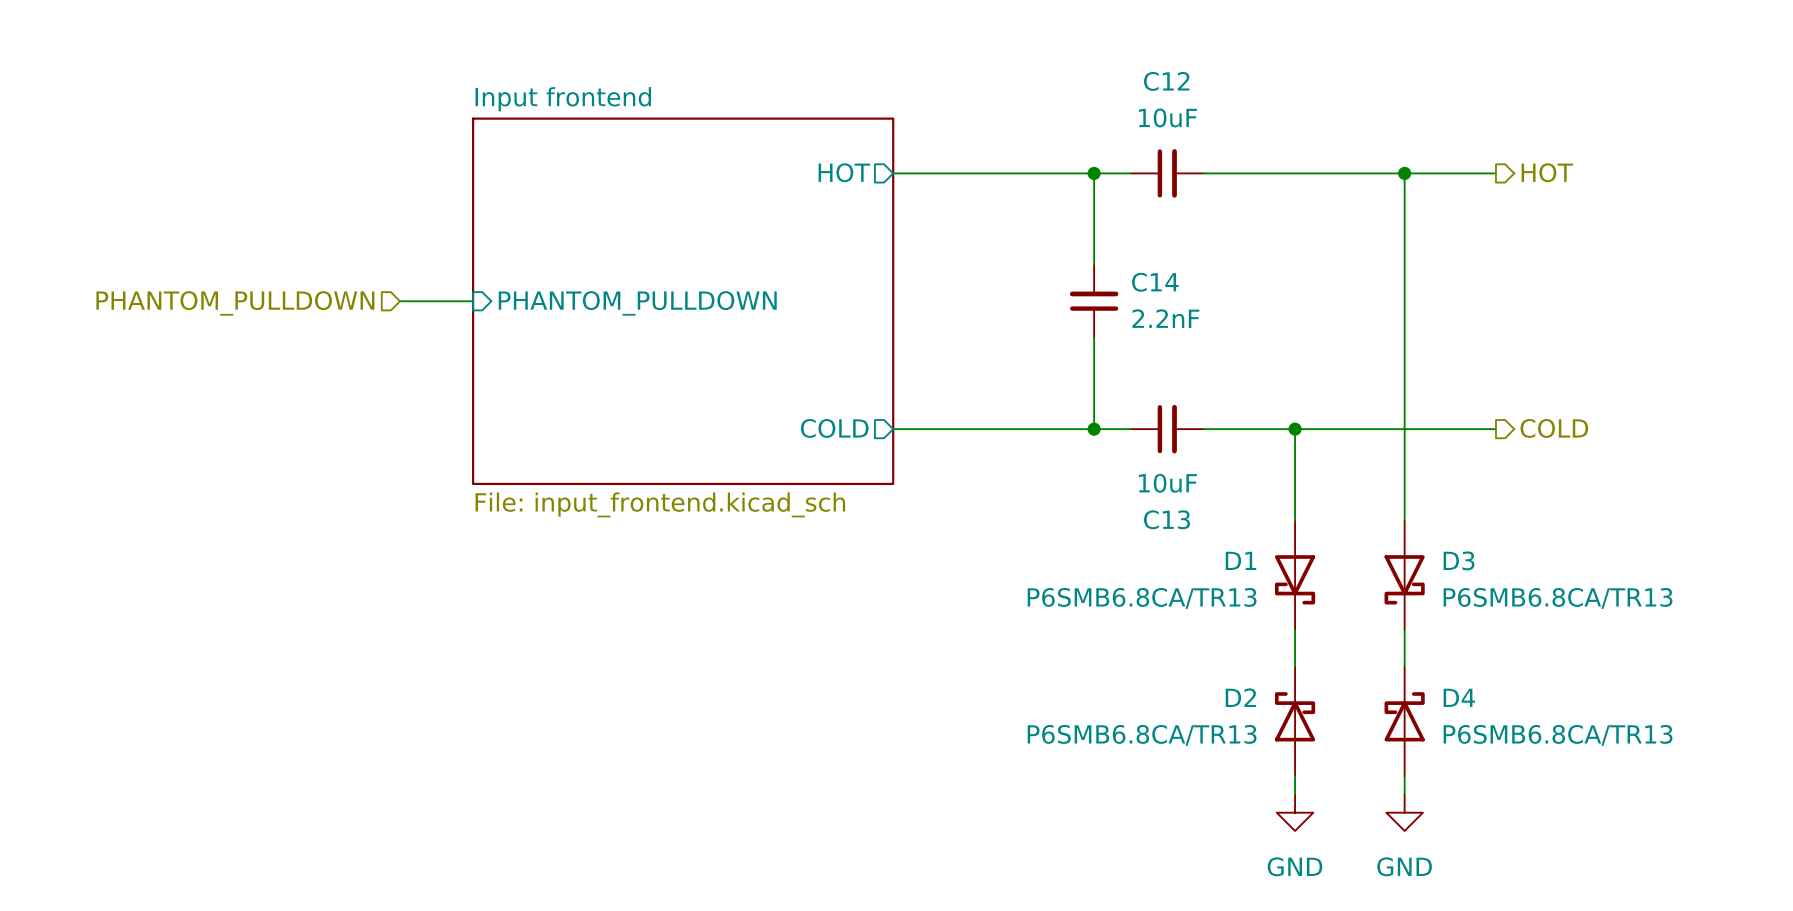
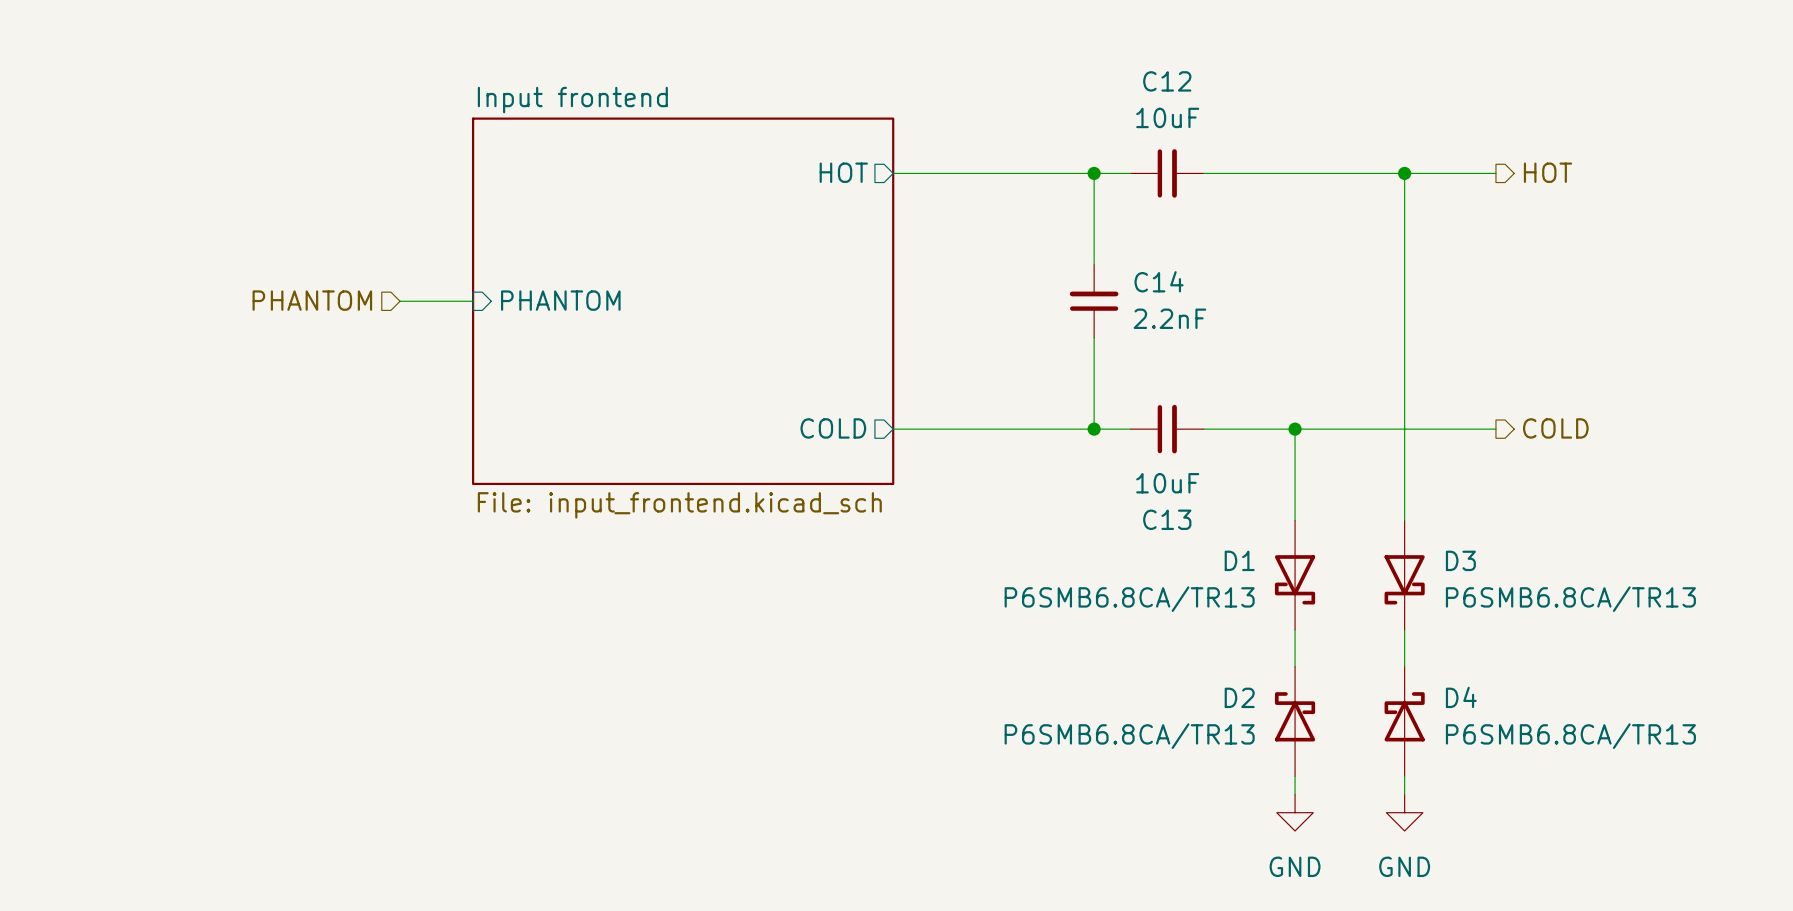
hierarchical label: PHANTOM_PULLDOWN (235, 303) -> PHANTOM (312, 300)
sheet pin: PHANTOM_PULLDOWN (637, 303) -> PHANTOM (560, 300)

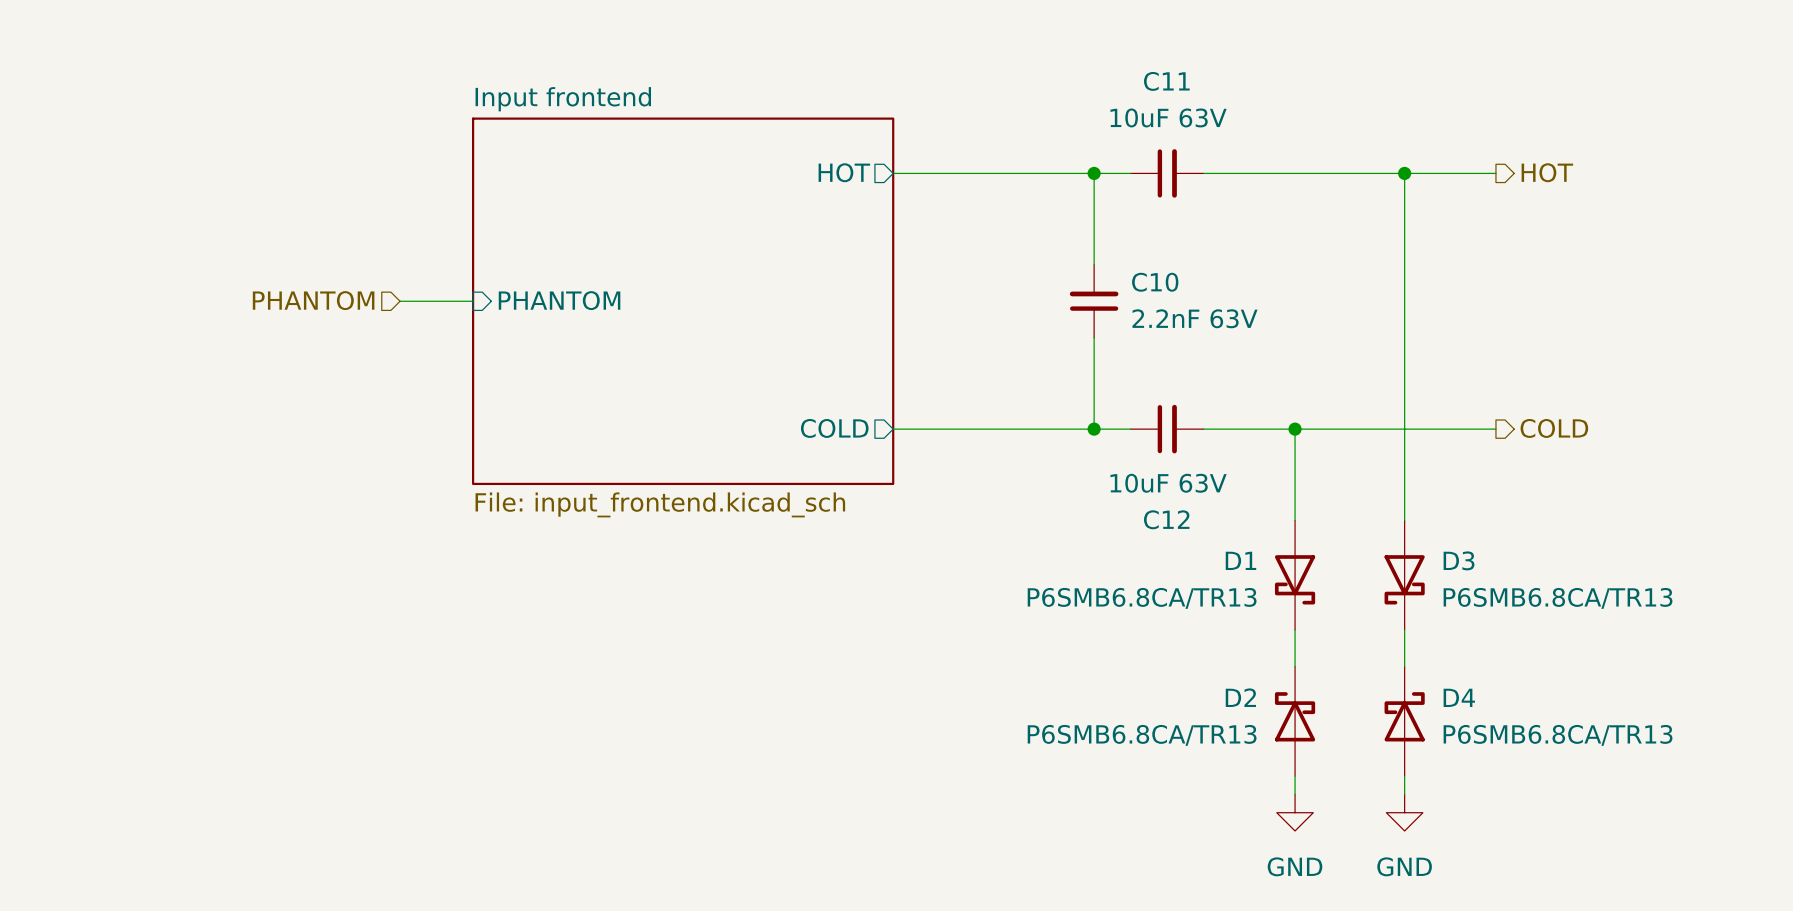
C12 name: C12 (1167, 81) -> C11 (1166, 81)
C12 value: 10uF (1167, 117) -> 10uF 63V (1168, 117)
C14 name: C14 (1159, 281) -> C10 (1155, 282)
C14 value: 2.2nF (1169, 318) -> 2.2nF 63V (1195, 318)
C13 value: 10uF (1167, 483) -> 10uF 63V (1168, 483)
C13 name: C13 (1167, 519) -> C12 (1166, 519)

